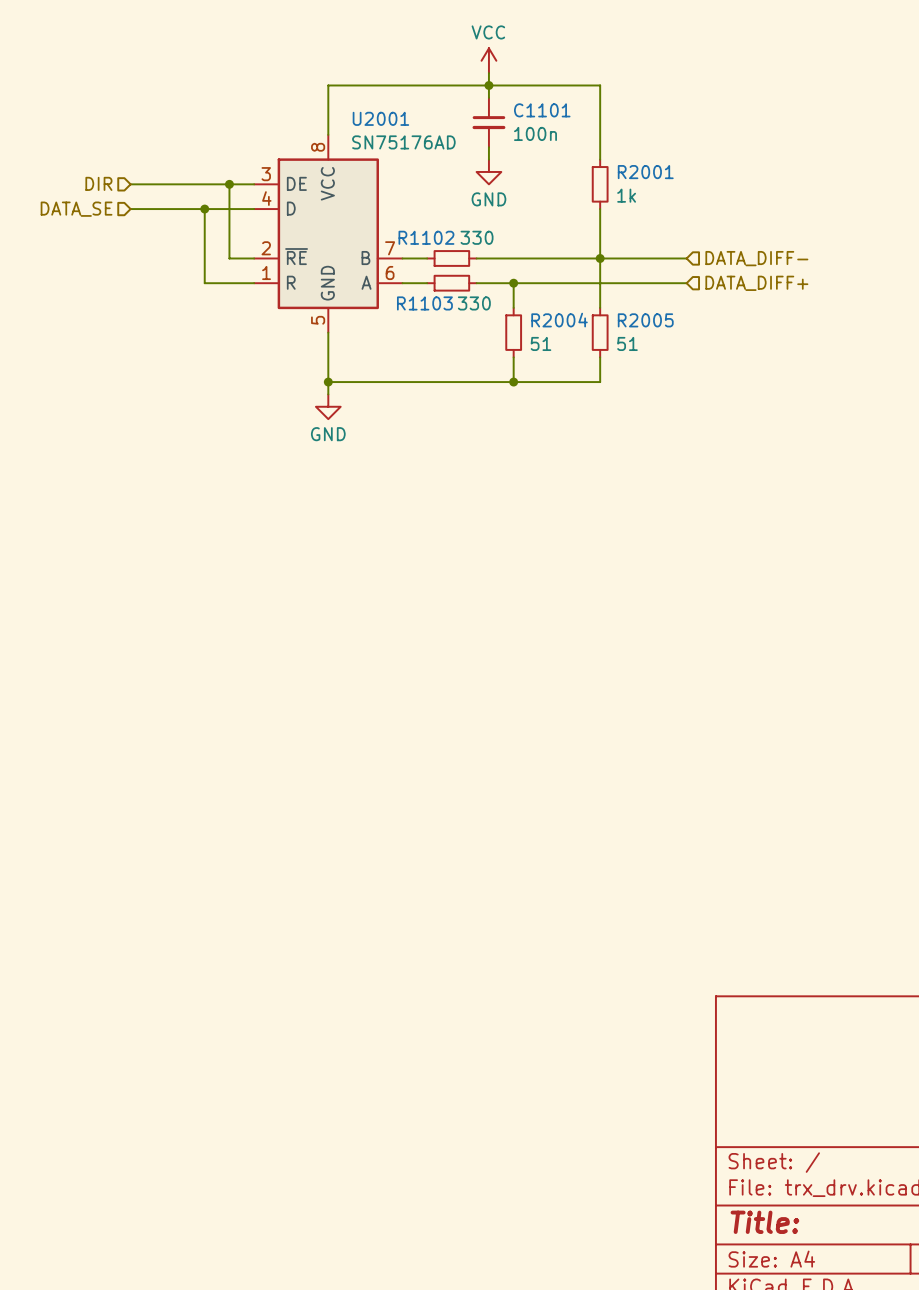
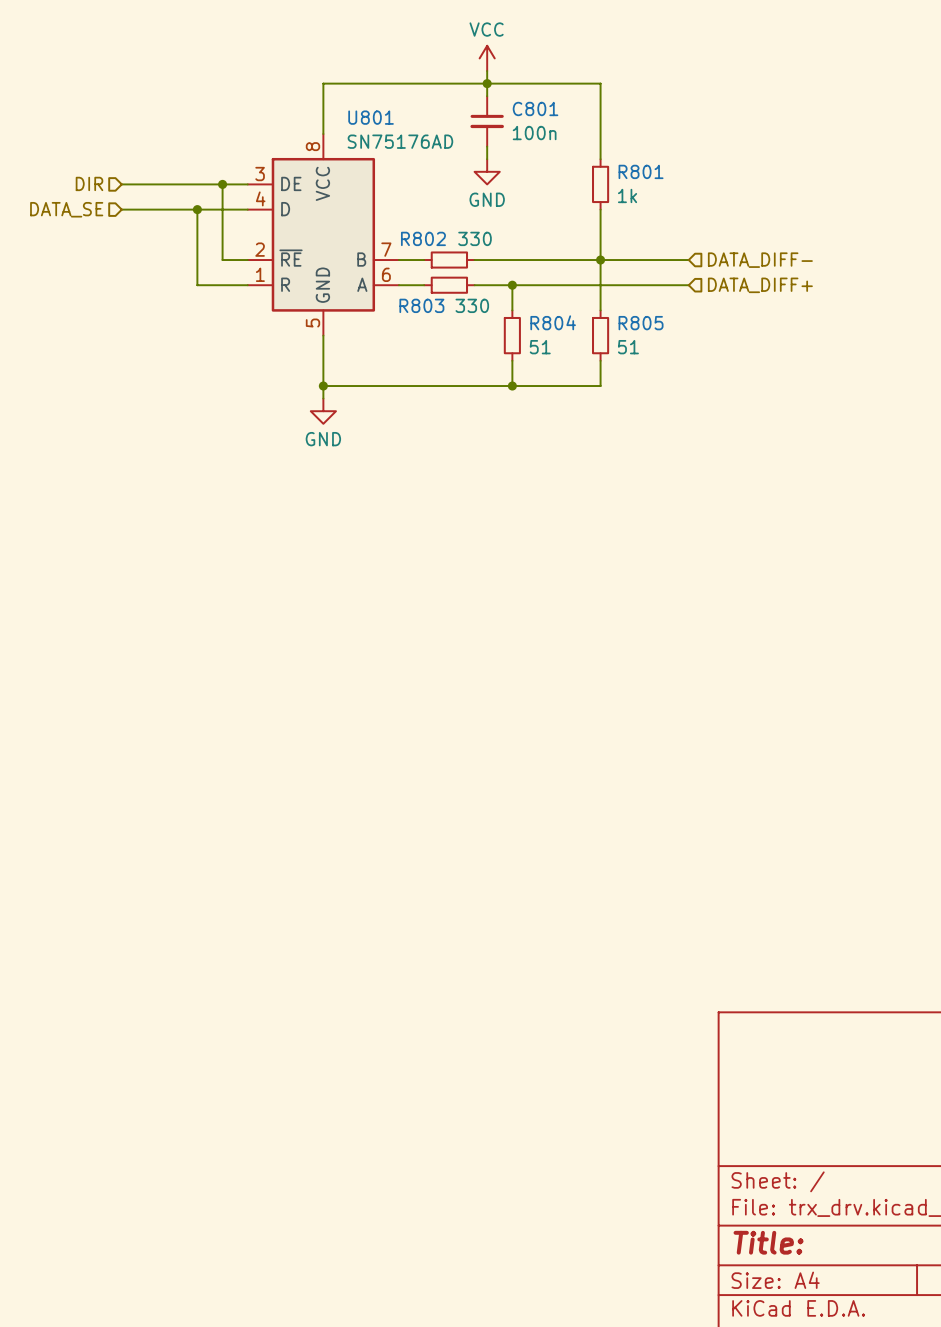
C1101 name: C1101 (542, 110) -> C801 (535, 108)
U2001 name: U2001 (380, 118) -> U801 (371, 117)
R2001 name: R2001 (645, 172) -> R801 (641, 171)
R1102 name: R1102 (426, 237) -> R802 (423, 238)
R1103 name: R1103 (424, 303) -> R803 (421, 305)
R2004 name: R2004 (559, 320) -> R804 (553, 322)
R2005 name: R2005 (645, 320) -> R805 (641, 323)

